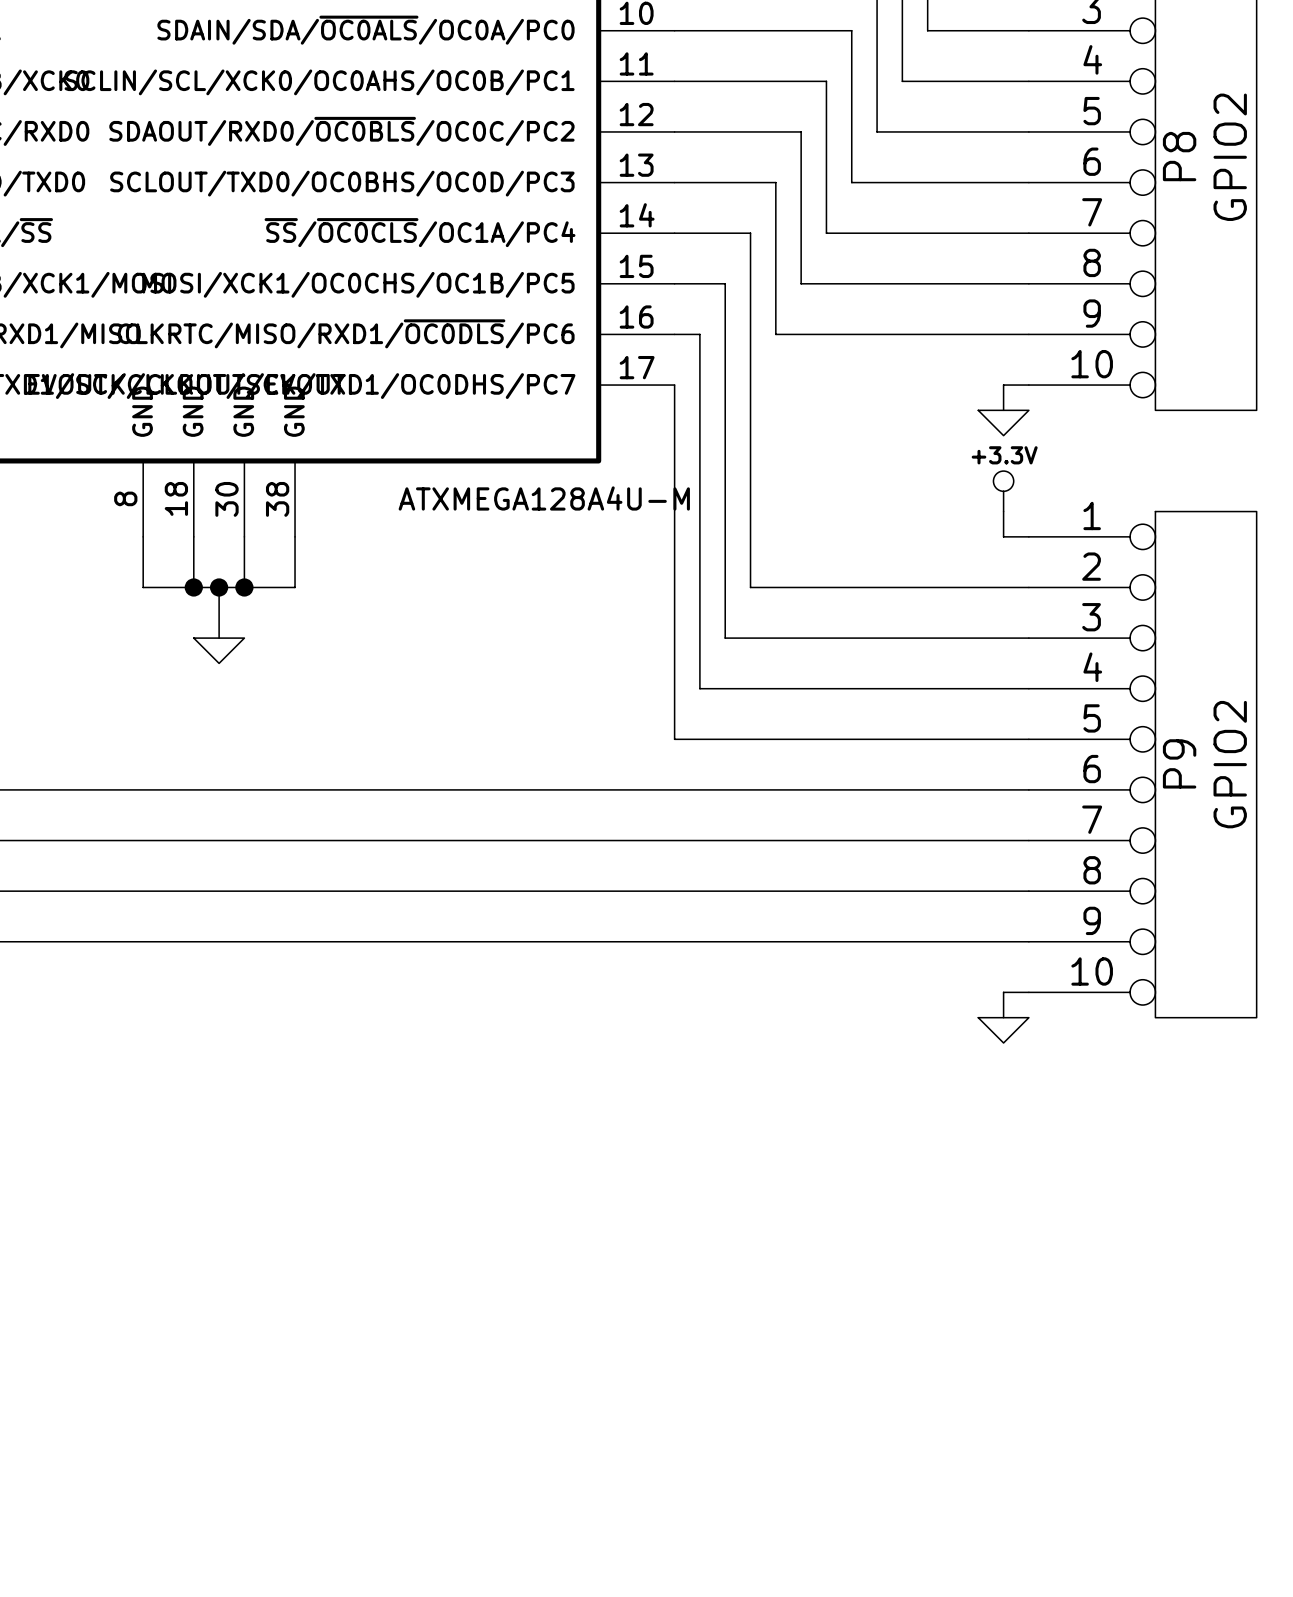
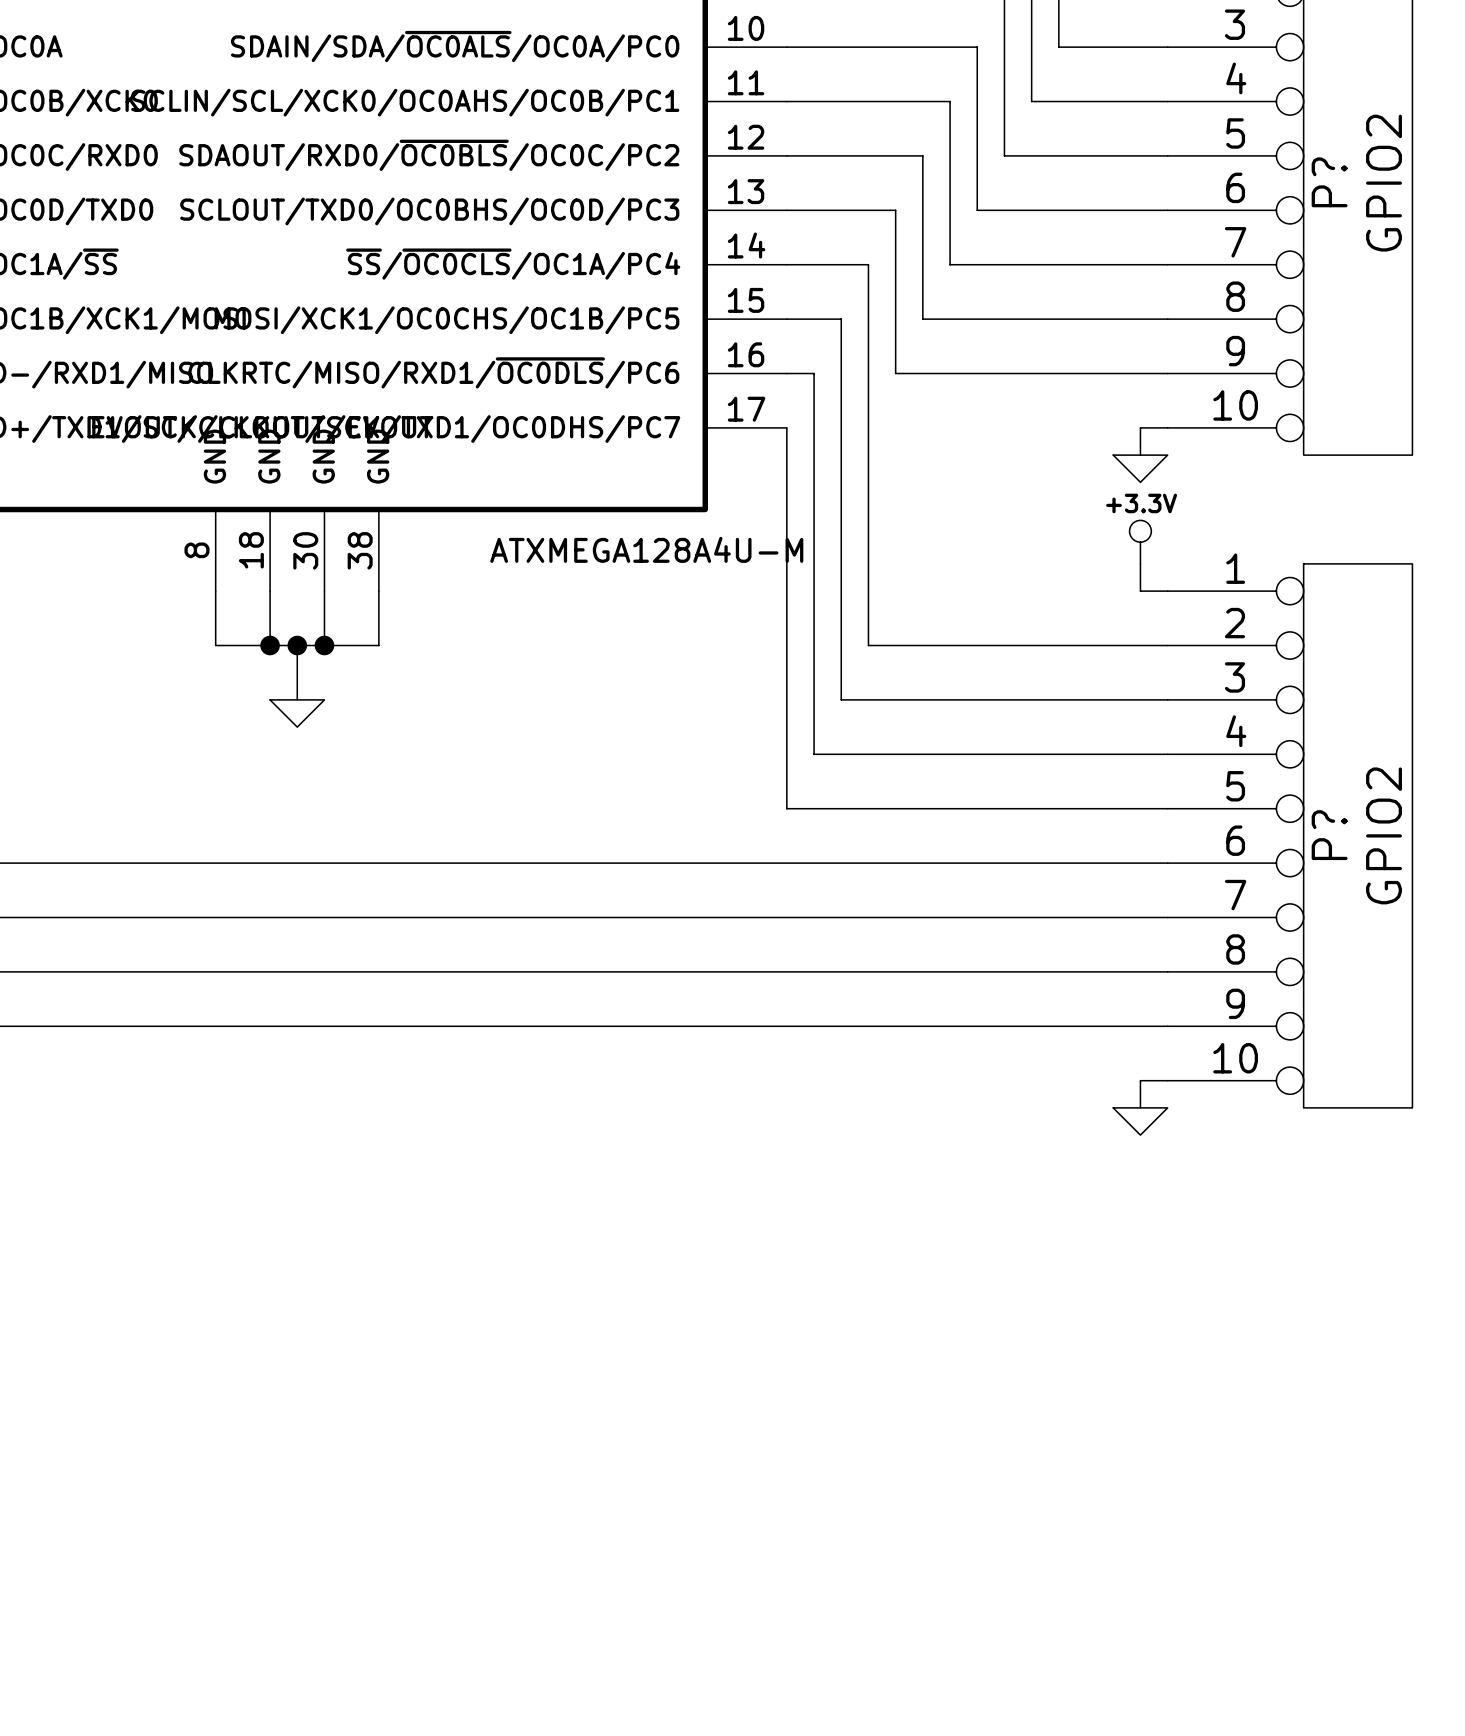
P8 name: P8 (1179, 156) -> P? (1329, 182)
P9 name: P9 (1179, 763) -> P? (1329, 835)

